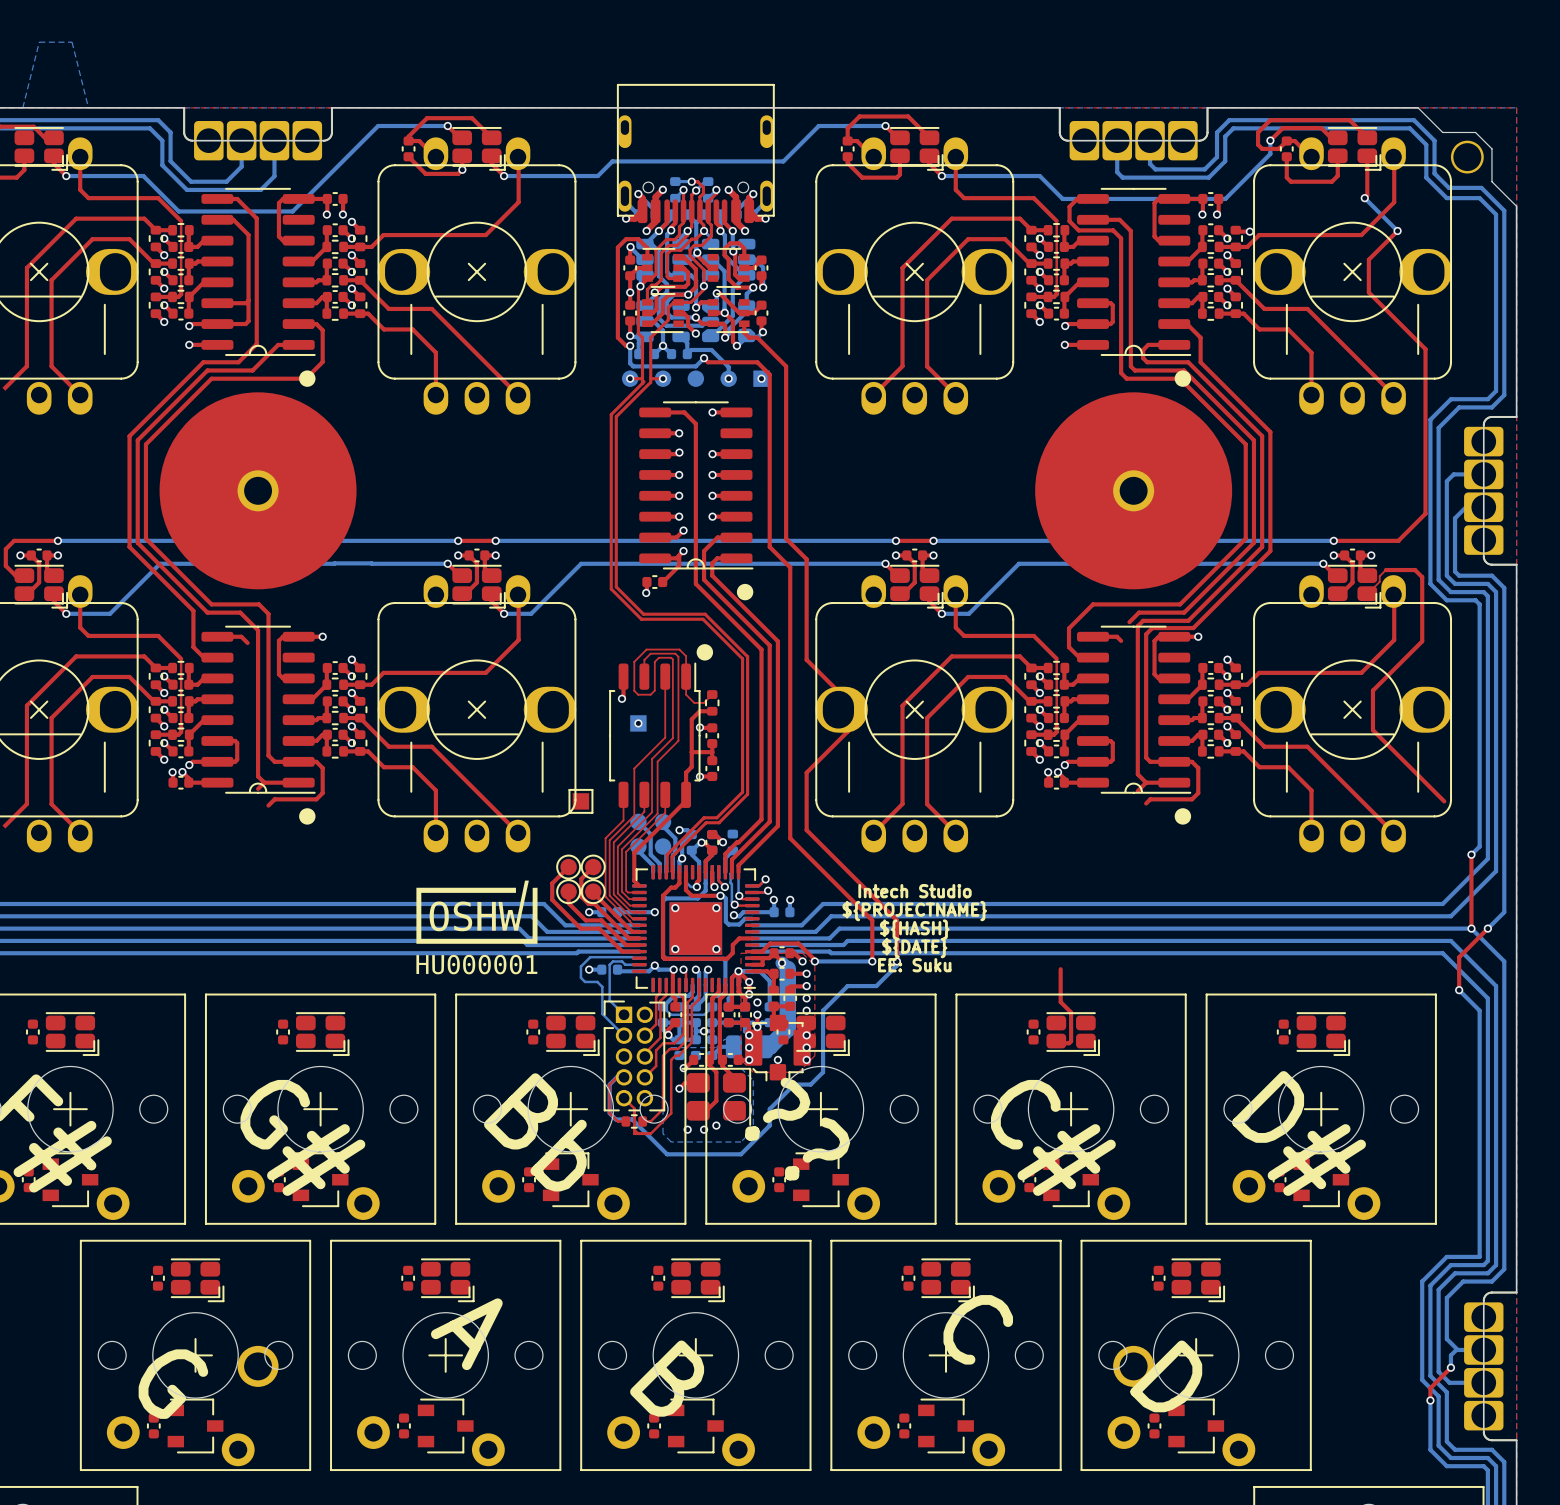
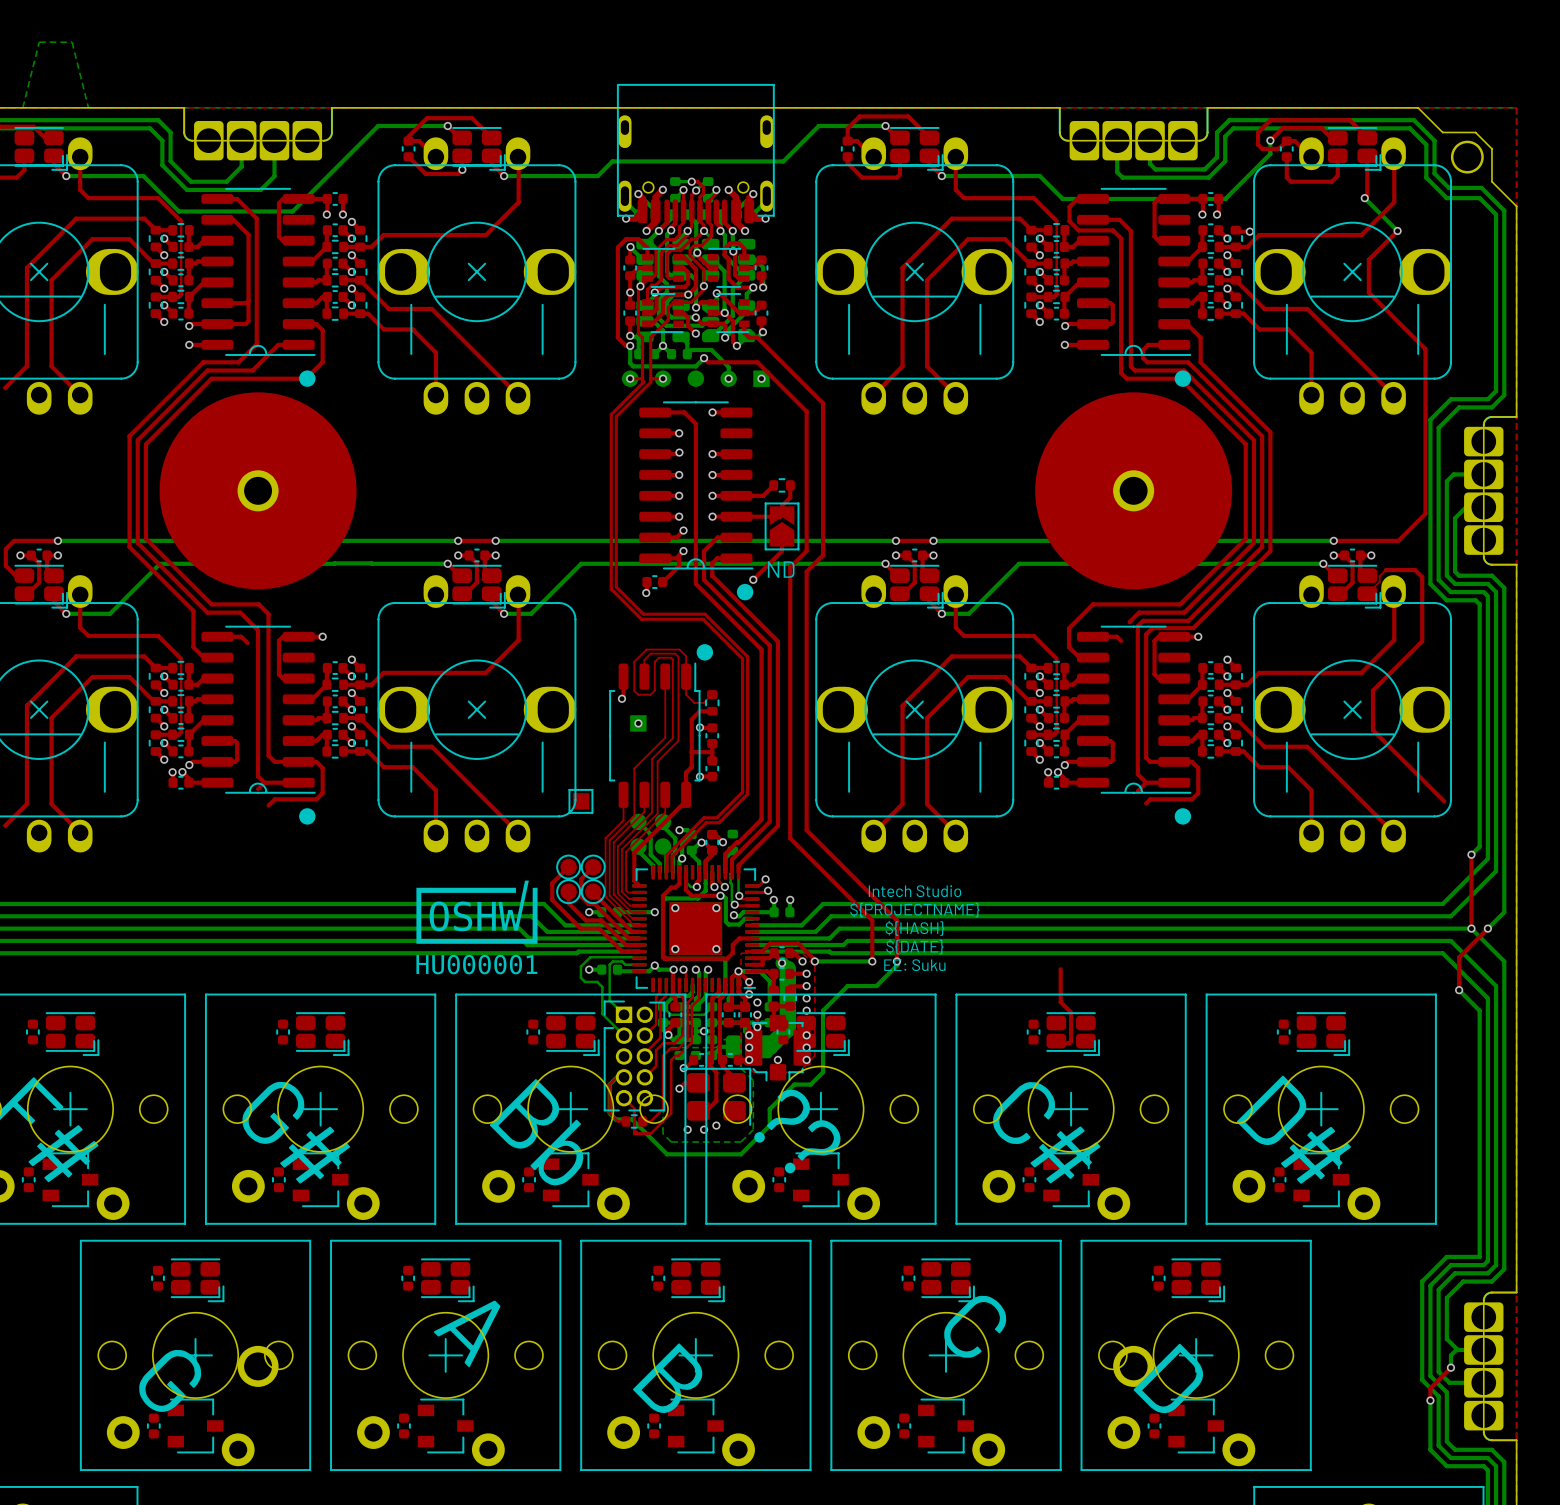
top track: (786, 366) (786, 538) (806, 559) (806, 571) -> (786, 366) (823, 403) (823, 555) (806, 571)
top track: (769, 374) (769, 546) (790, 567) -> (769, 374) (806, 411) (806, 551) (790, 567)
top track: none -> (773, 485) (763, 495) (736, 495)
part: none -> (782, 485)
top track: none -> (790, 485) (790, 497) (782, 505) (782, 514) (779, 516) (736, 516)
part: none -> (782, 526)
top track: none -> (782, 538) (782, 551) (753, 579)
text: none -> ND (781, 569)
via: none -> (753, 579)
top track: (806, 659) (847, 700) (847, 731) (806, 772) -> (806, 659) (806, 772)

